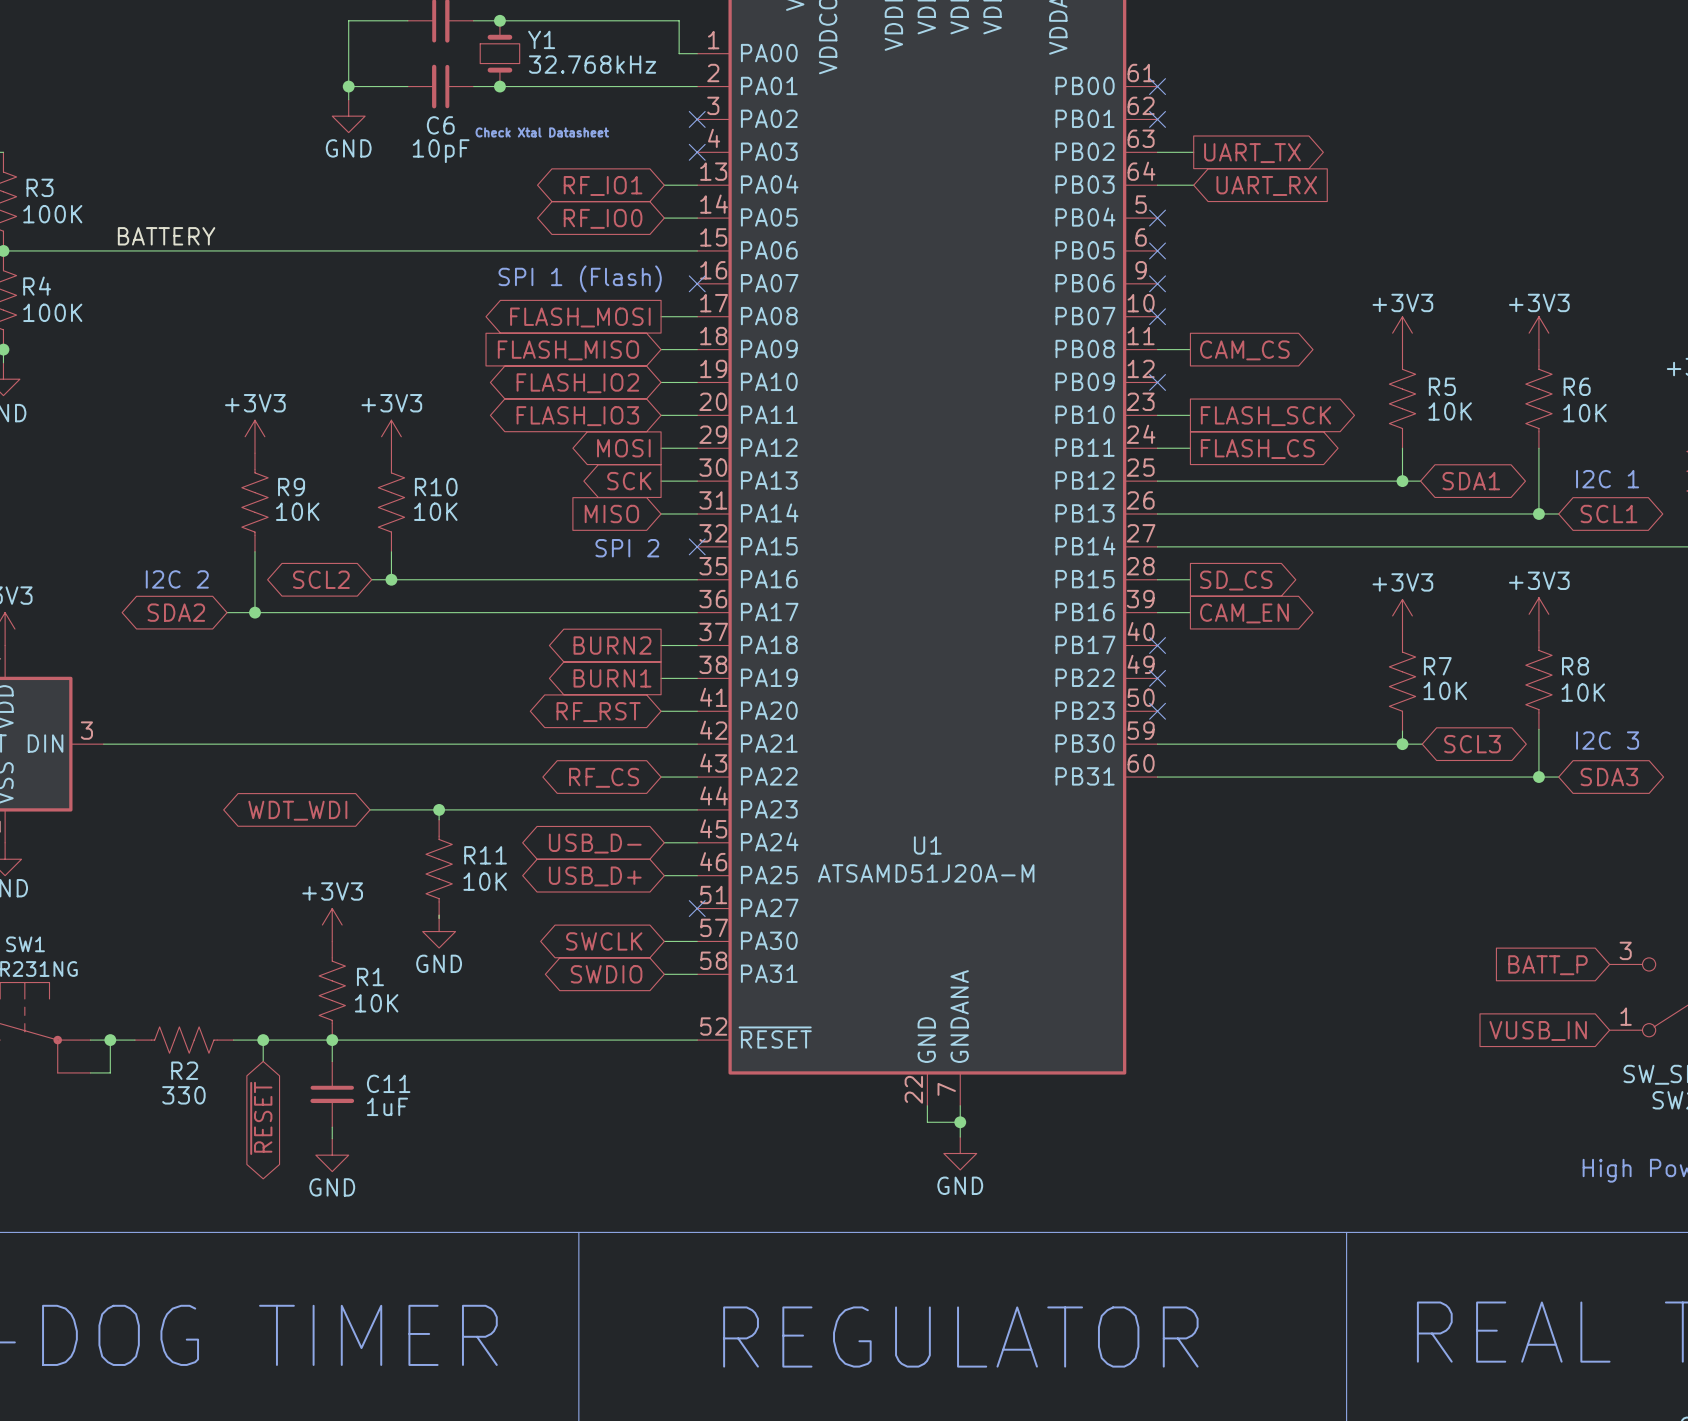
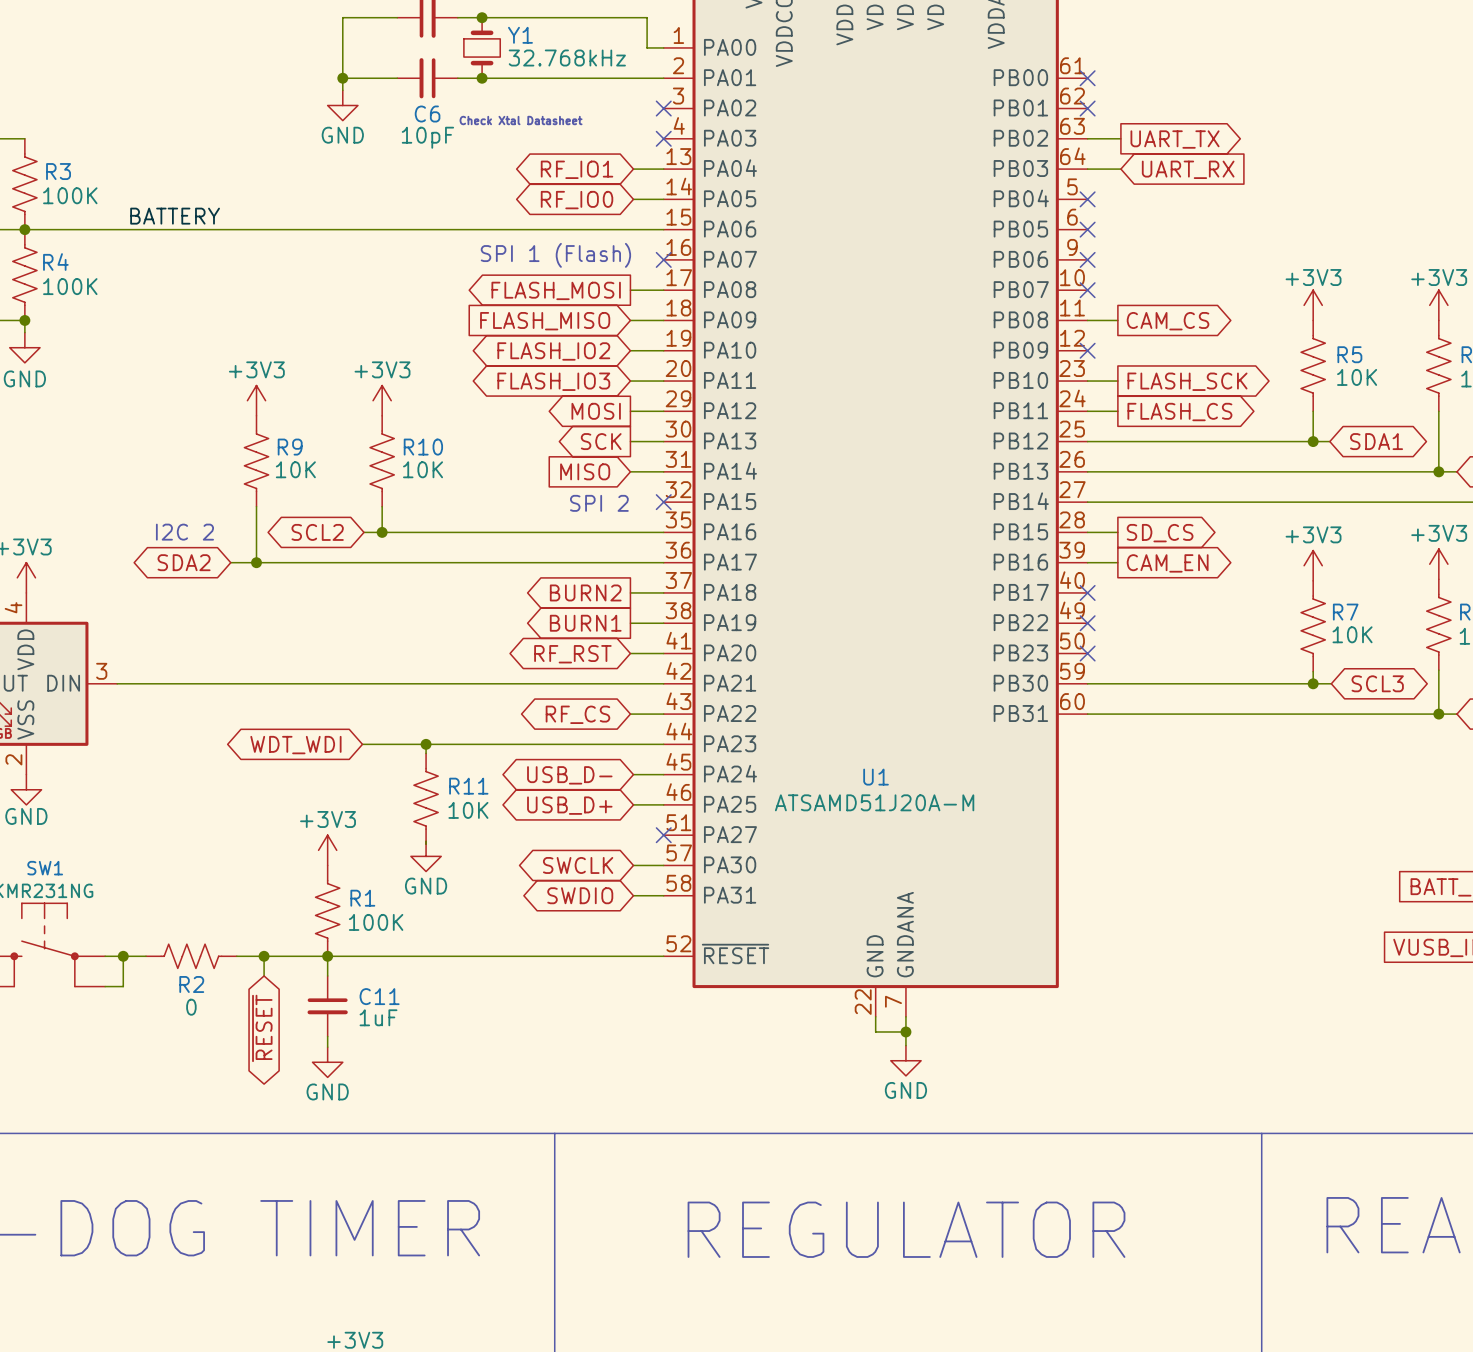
R1 value: 10K (376, 1003) -> 100K (376, 922)
R2 value: 330 (183, 1095) -> 0 (191, 1007)

